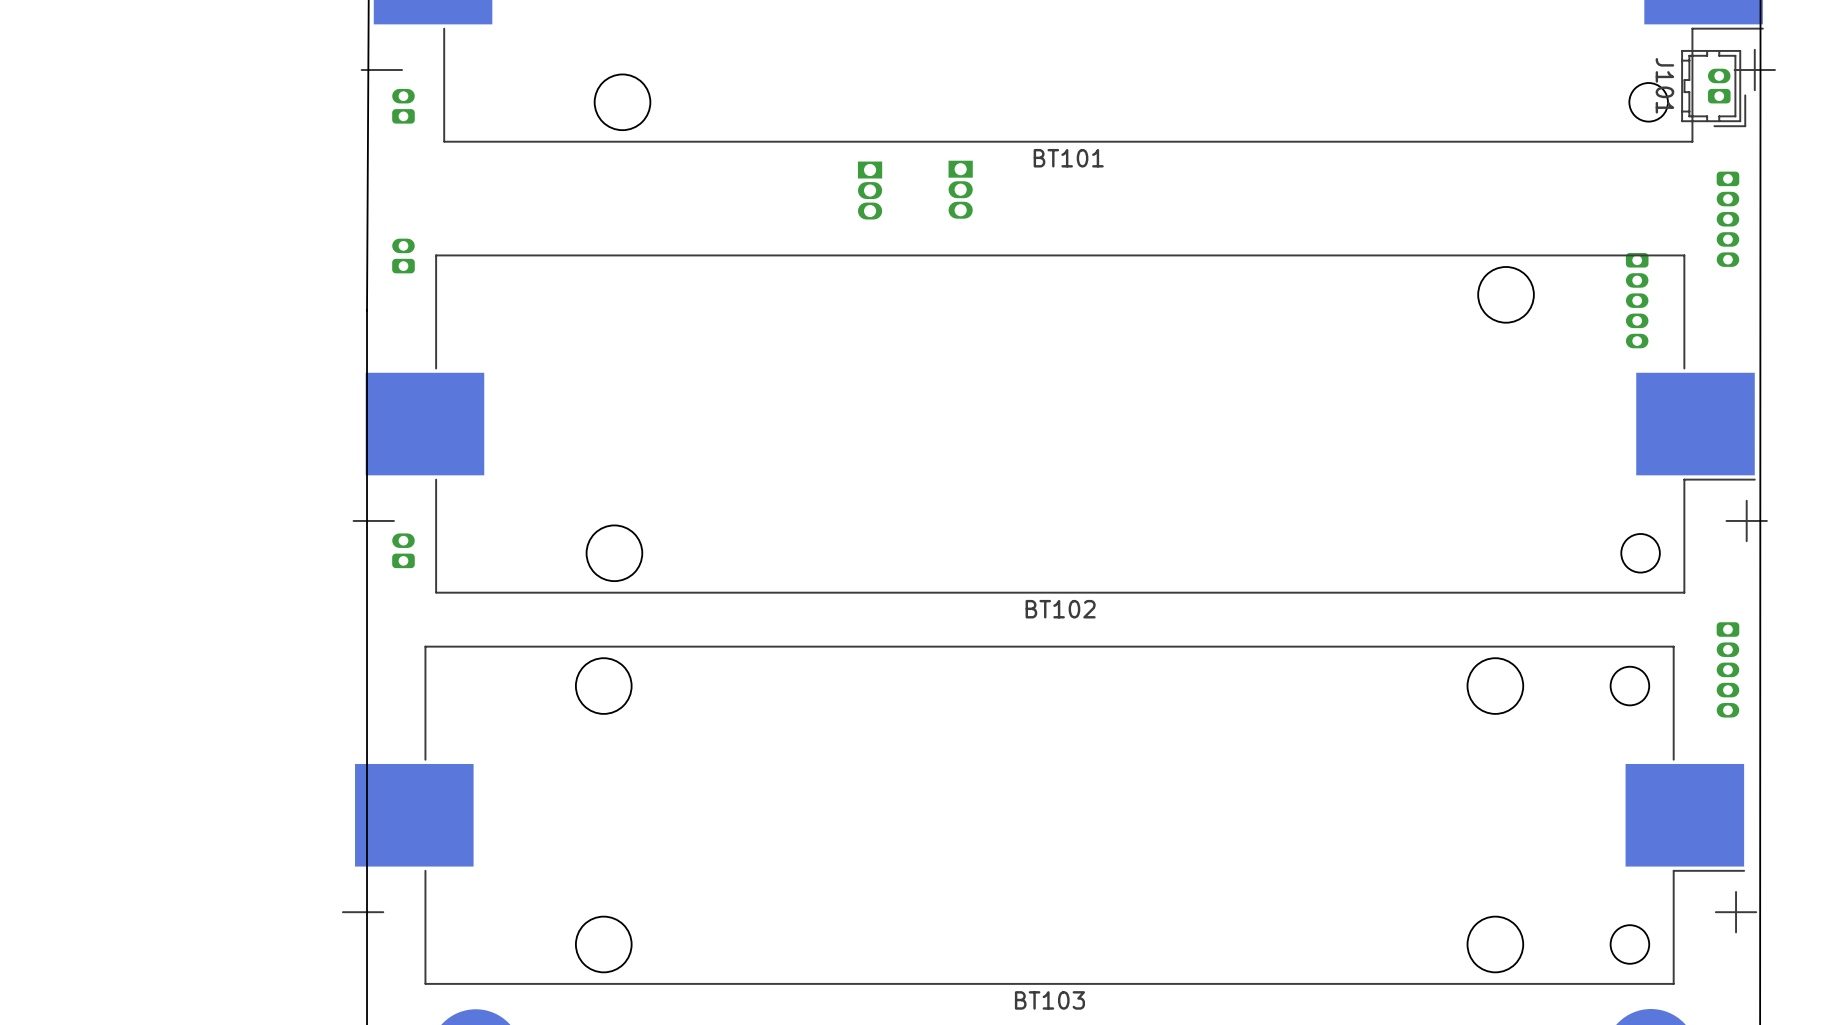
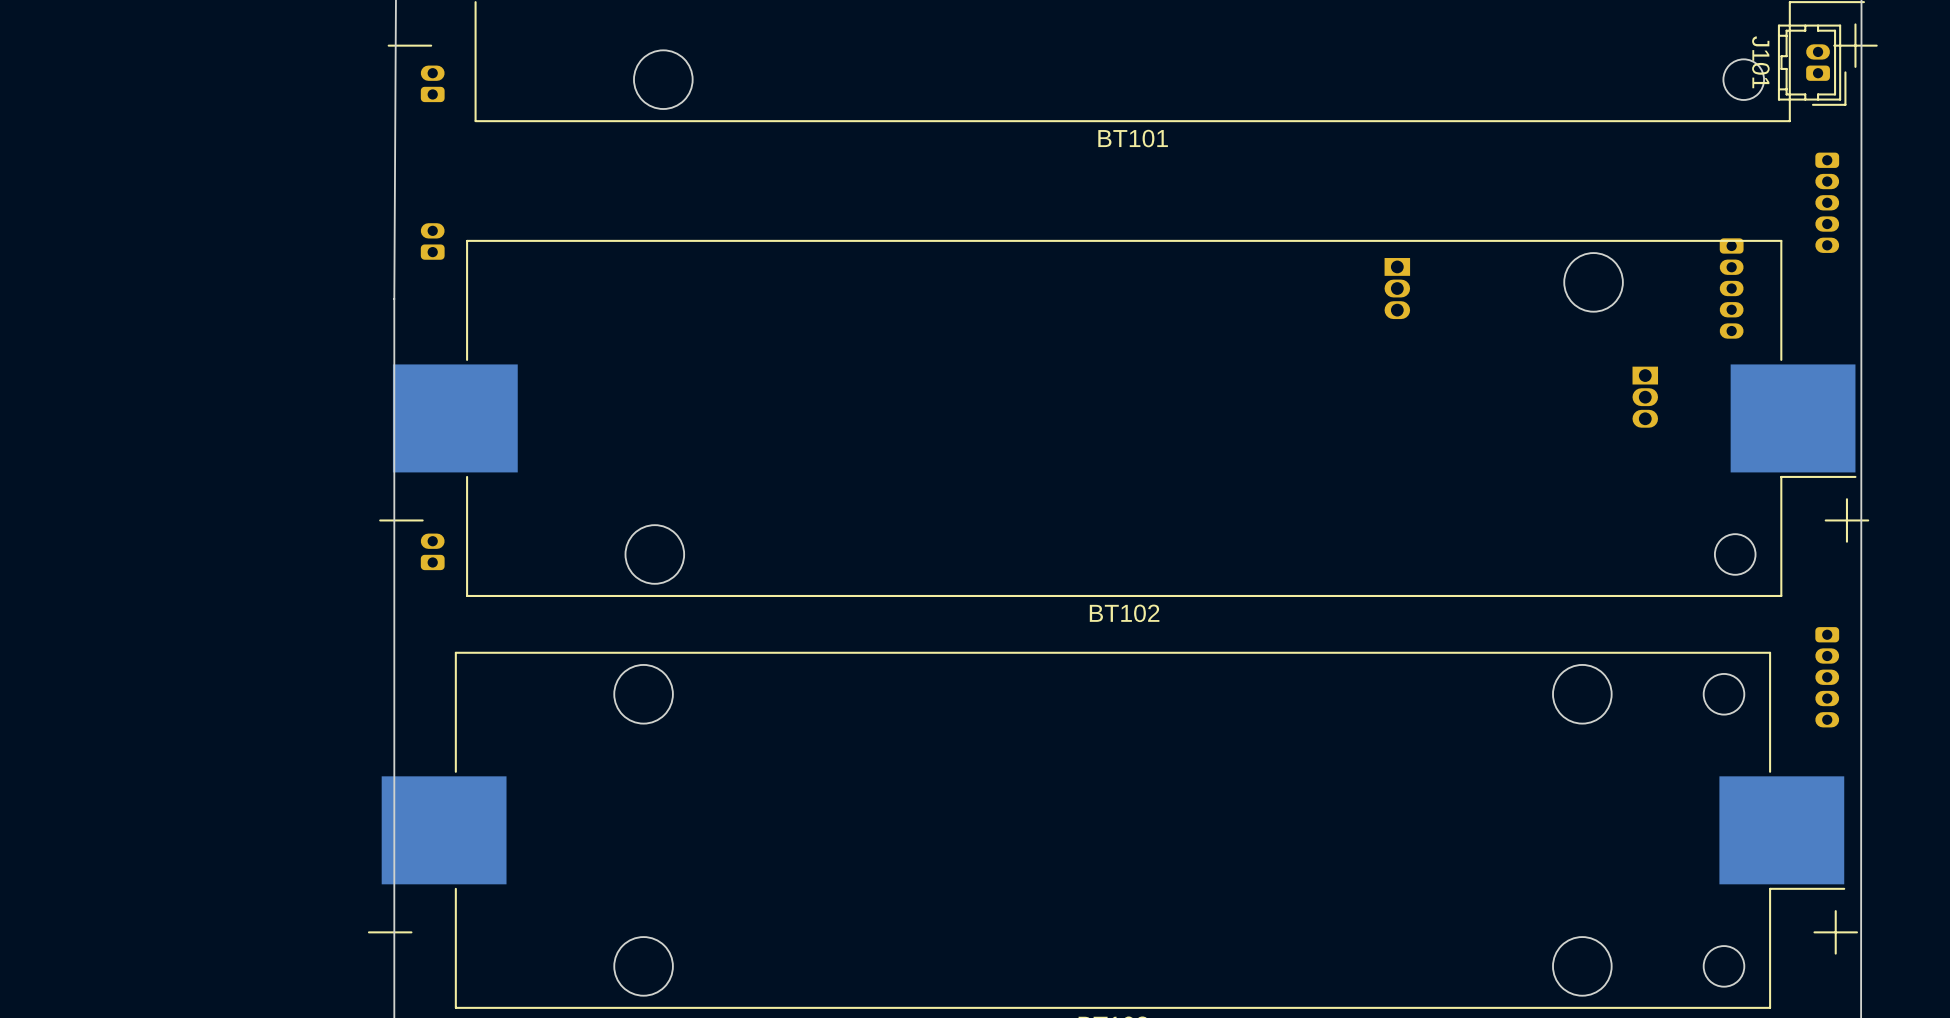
part: (960, 189) -> none
part: (870, 190) -> none
part: none -> (1397, 288)
part: none -> (1645, 397)

